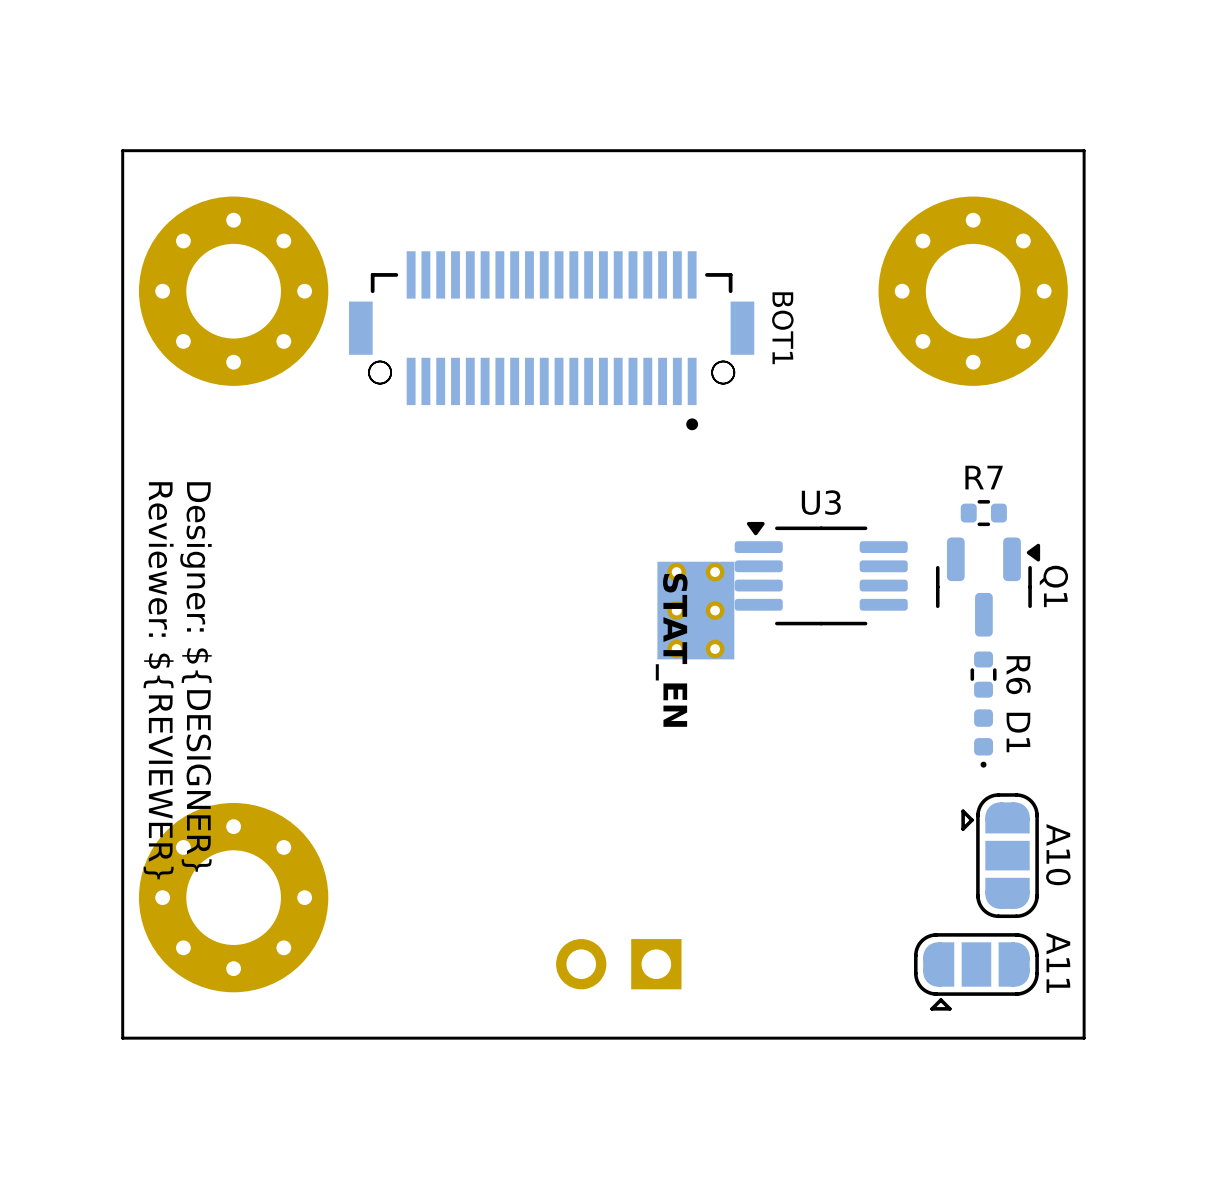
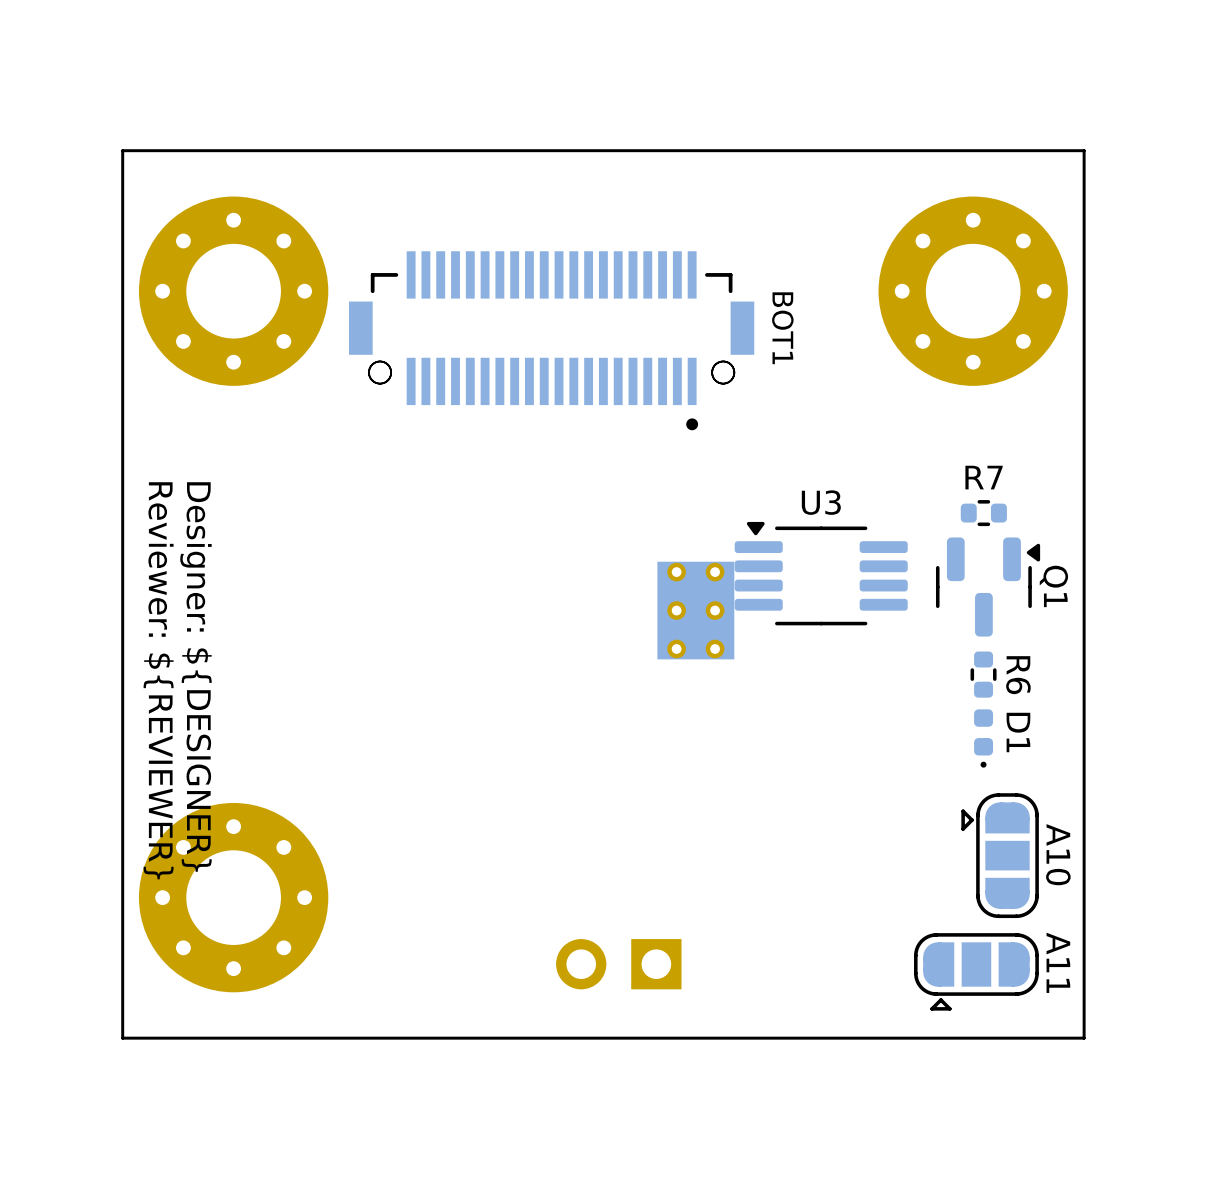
text: STAT_EN (671, 650) -> none

